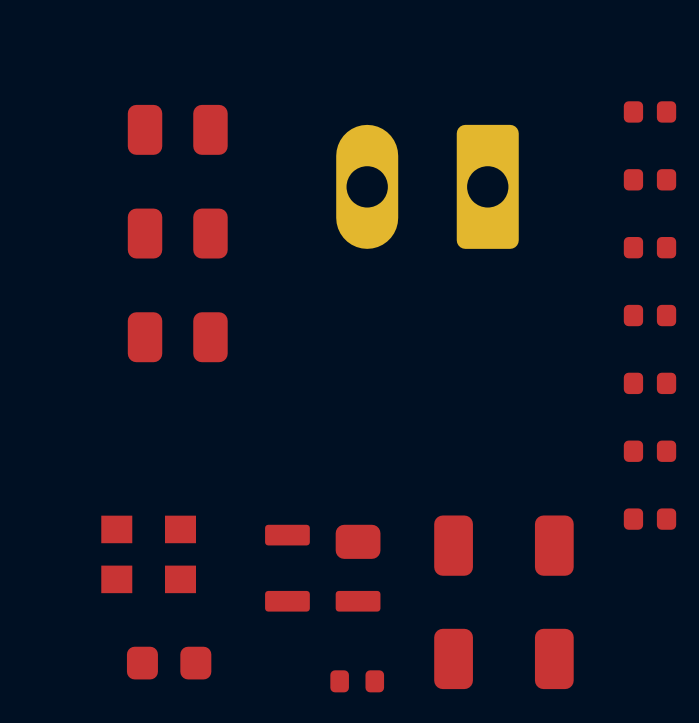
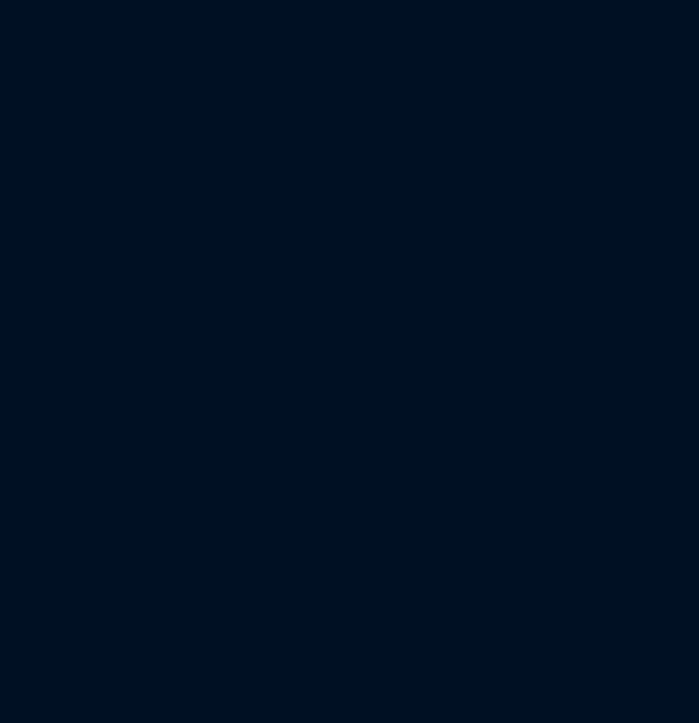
part: (649, 111) -> none
part: (177, 129) -> none
part: (649, 179) -> none
part: (427, 186) -> none
part: (177, 233) -> none
part: (649, 247) -> none
part: (649, 315) -> none
part: (177, 337) -> none
part: (649, 383) -> none
part: (649, 451) -> none
part: (649, 519) -> none
part: (503, 545) -> none
part: (148, 554) -> none
part: (322, 568) -> none
part: (503, 658) -> none
part: (169, 663) -> none
part: (357, 681) -> none

